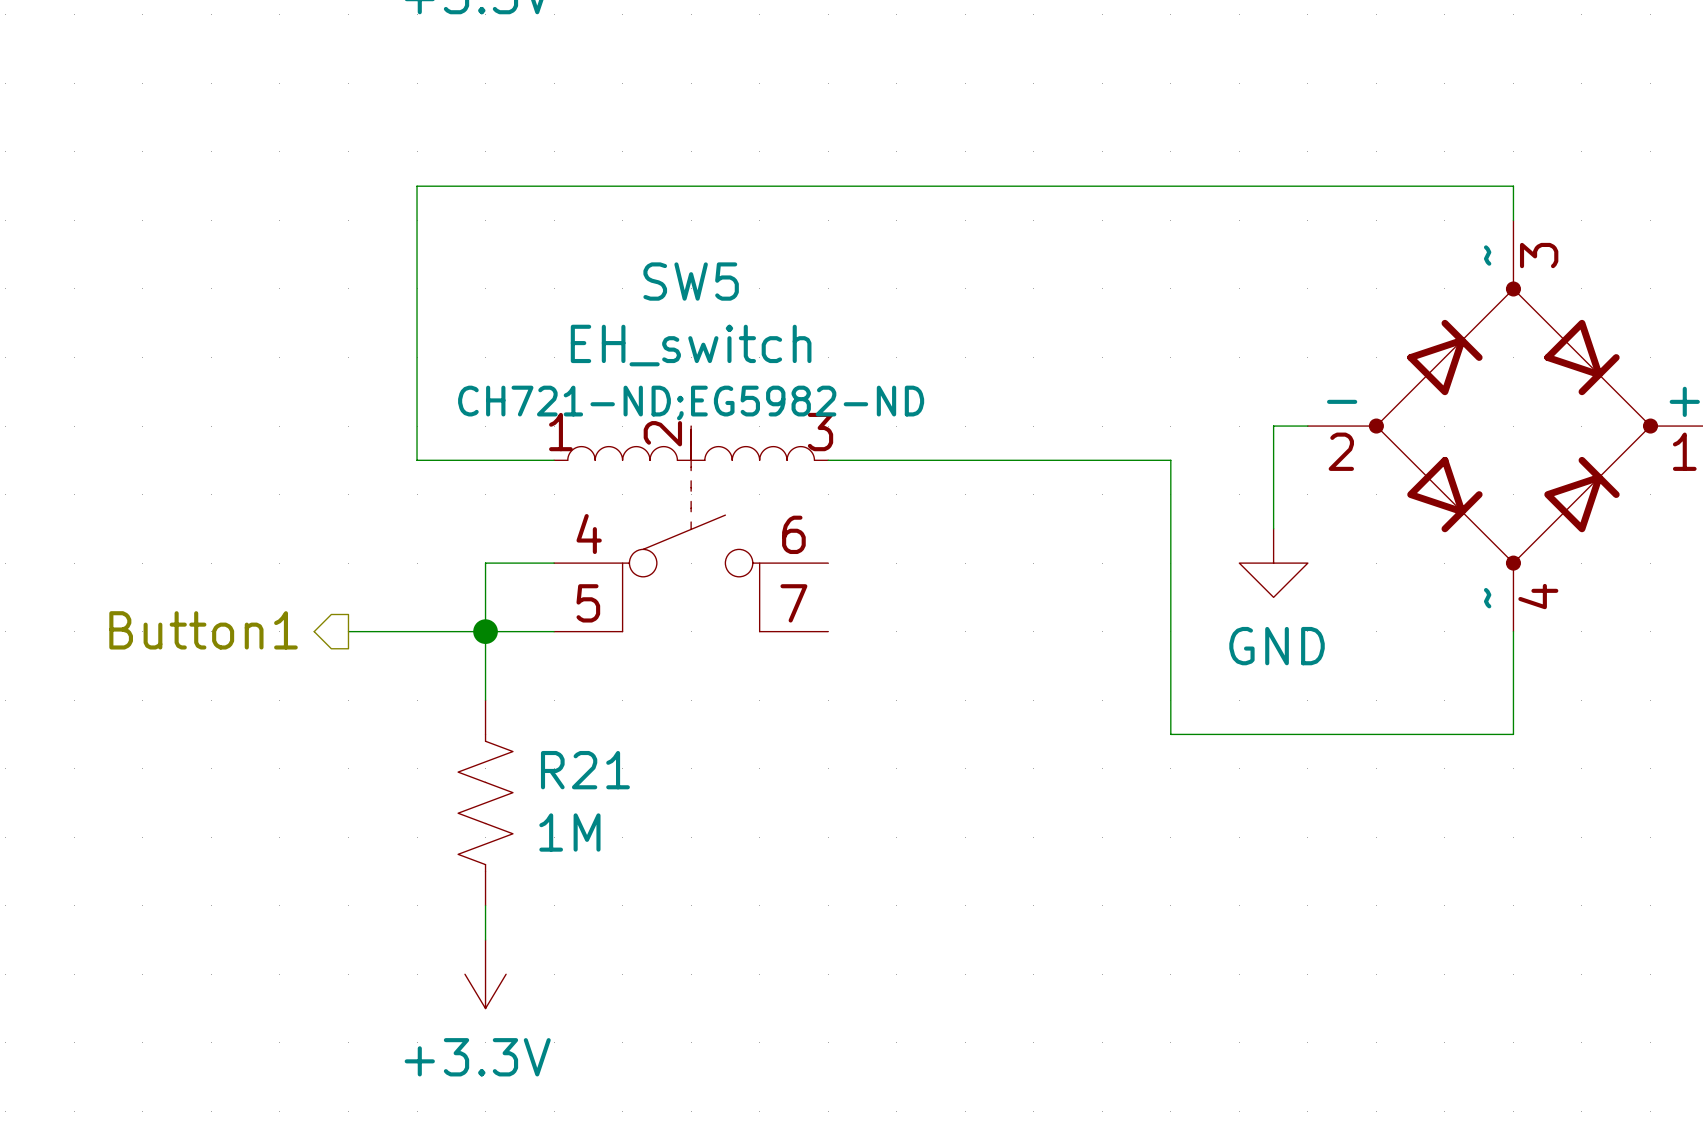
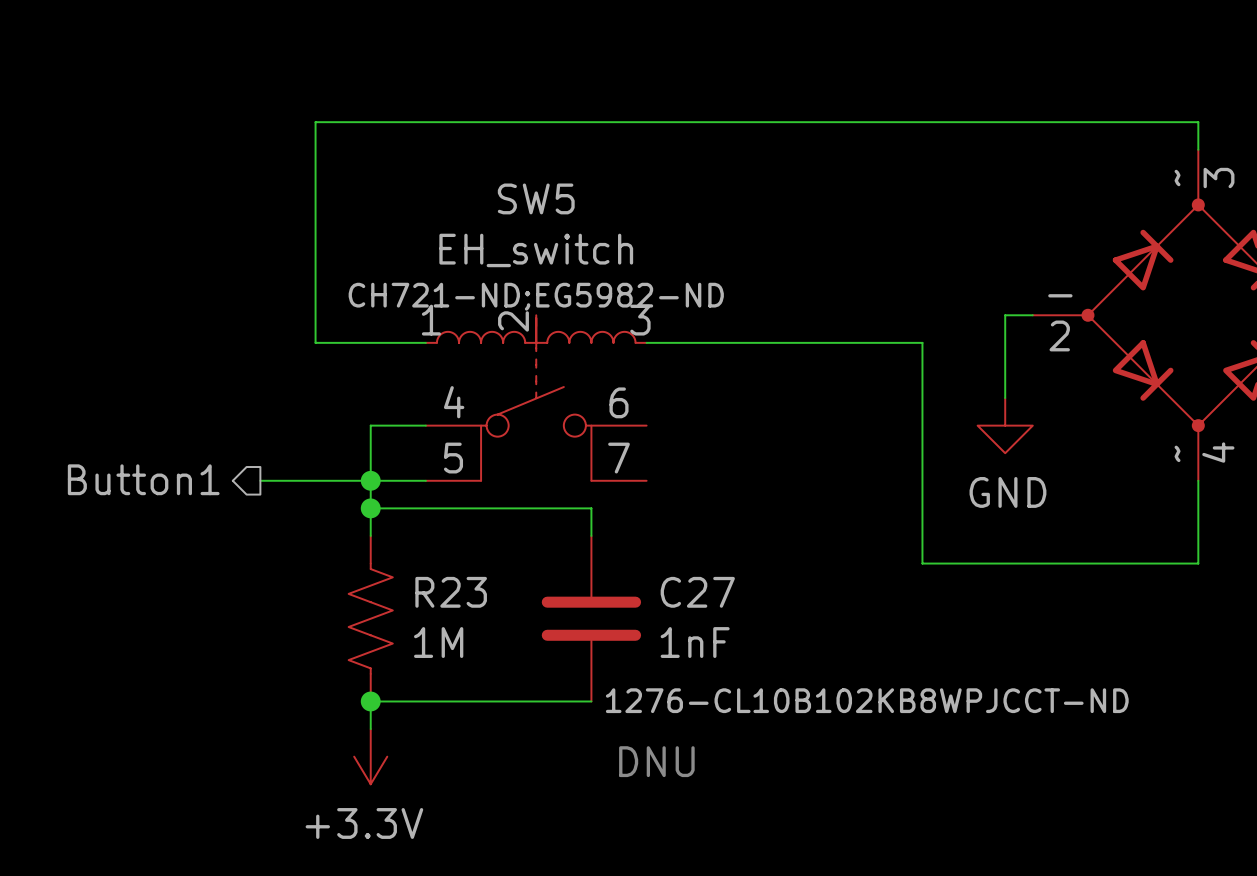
wire: none -> (370, 508) (591, 508) (591, 535)
junction: none -> (370, 508)
R21 name: R21 (585, 770) -> R23 (451, 592)
C27: none -> 1nF (591, 618)
wire: none -> (370, 701) (591, 701)
junction: none -> (370, 701)
text: none -> DNU (656, 761)

